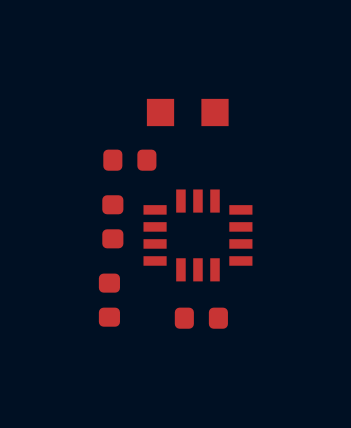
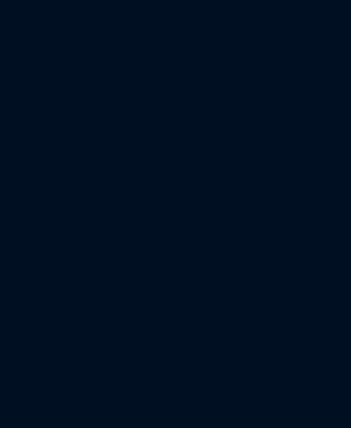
part: (187, 112) -> none
part: (129, 160) -> none
part: (112, 221) -> none
part: (197, 235) -> none
part: (109, 300) -> none
part: (201, 318) -> none

